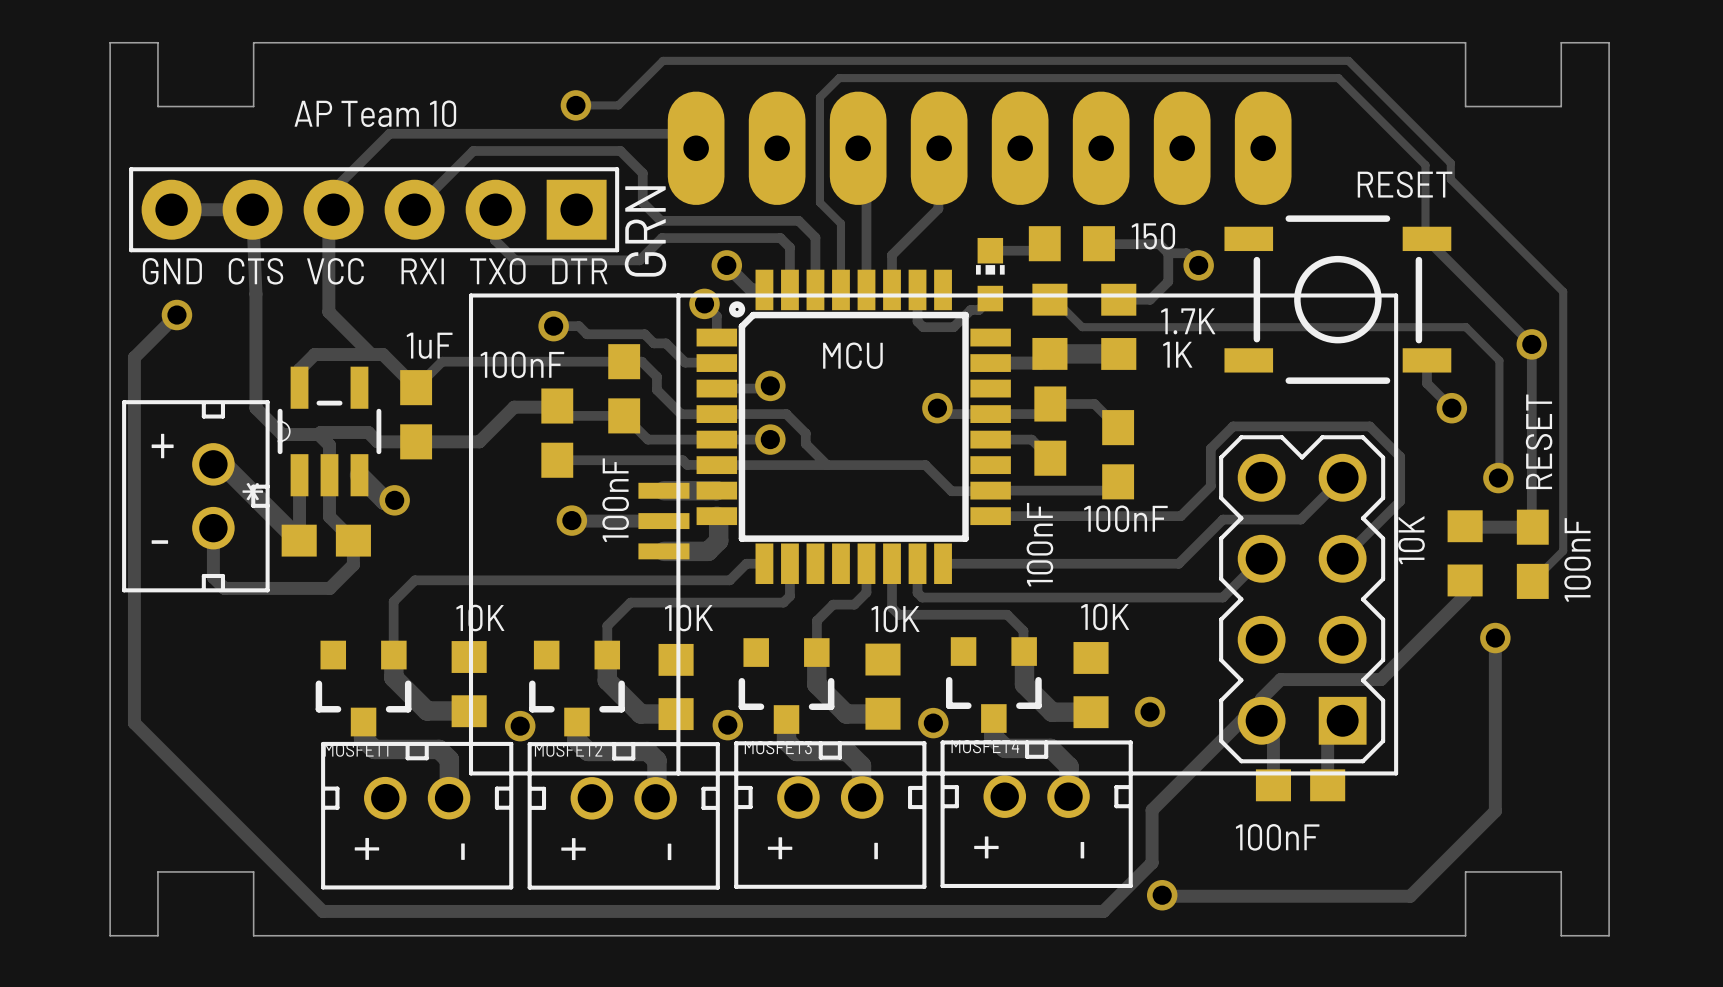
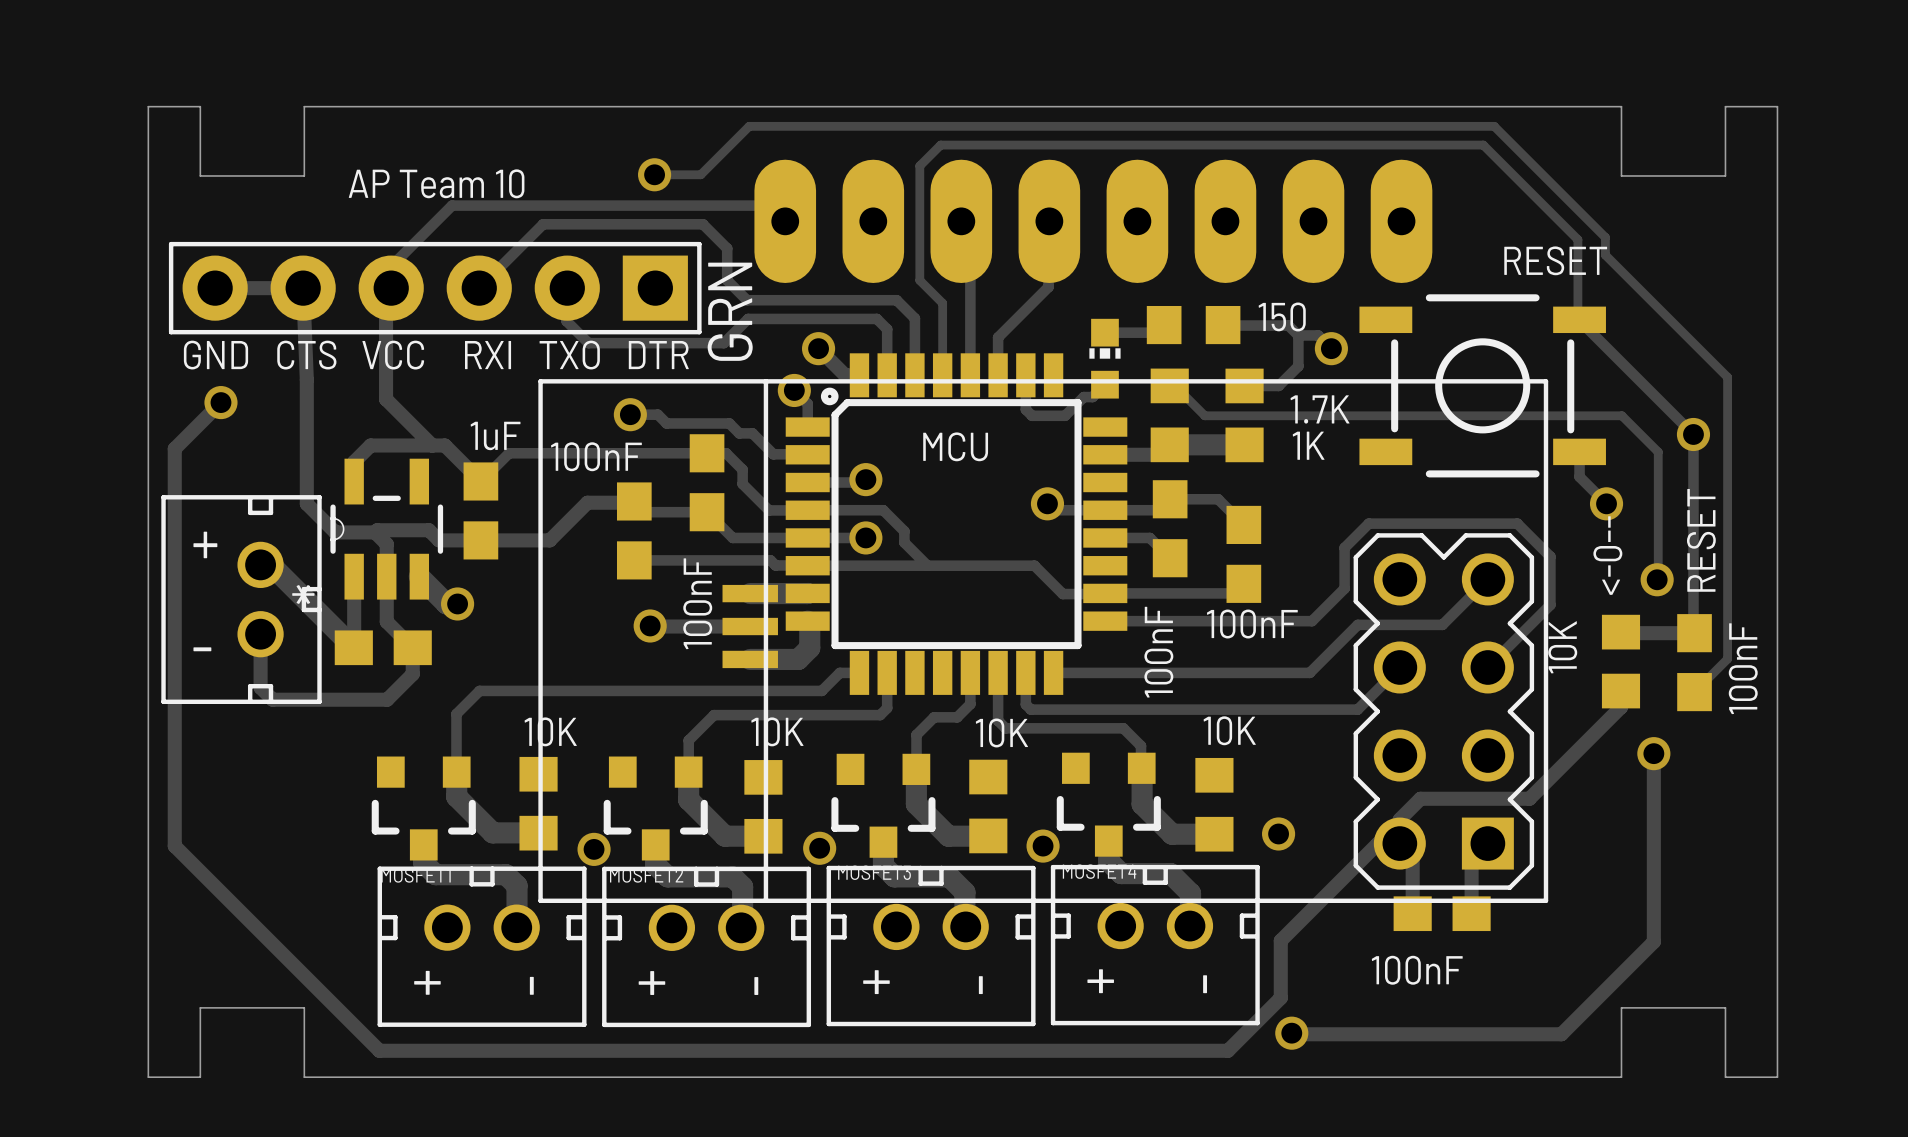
text: none -> <-0-- (1607, 555)

